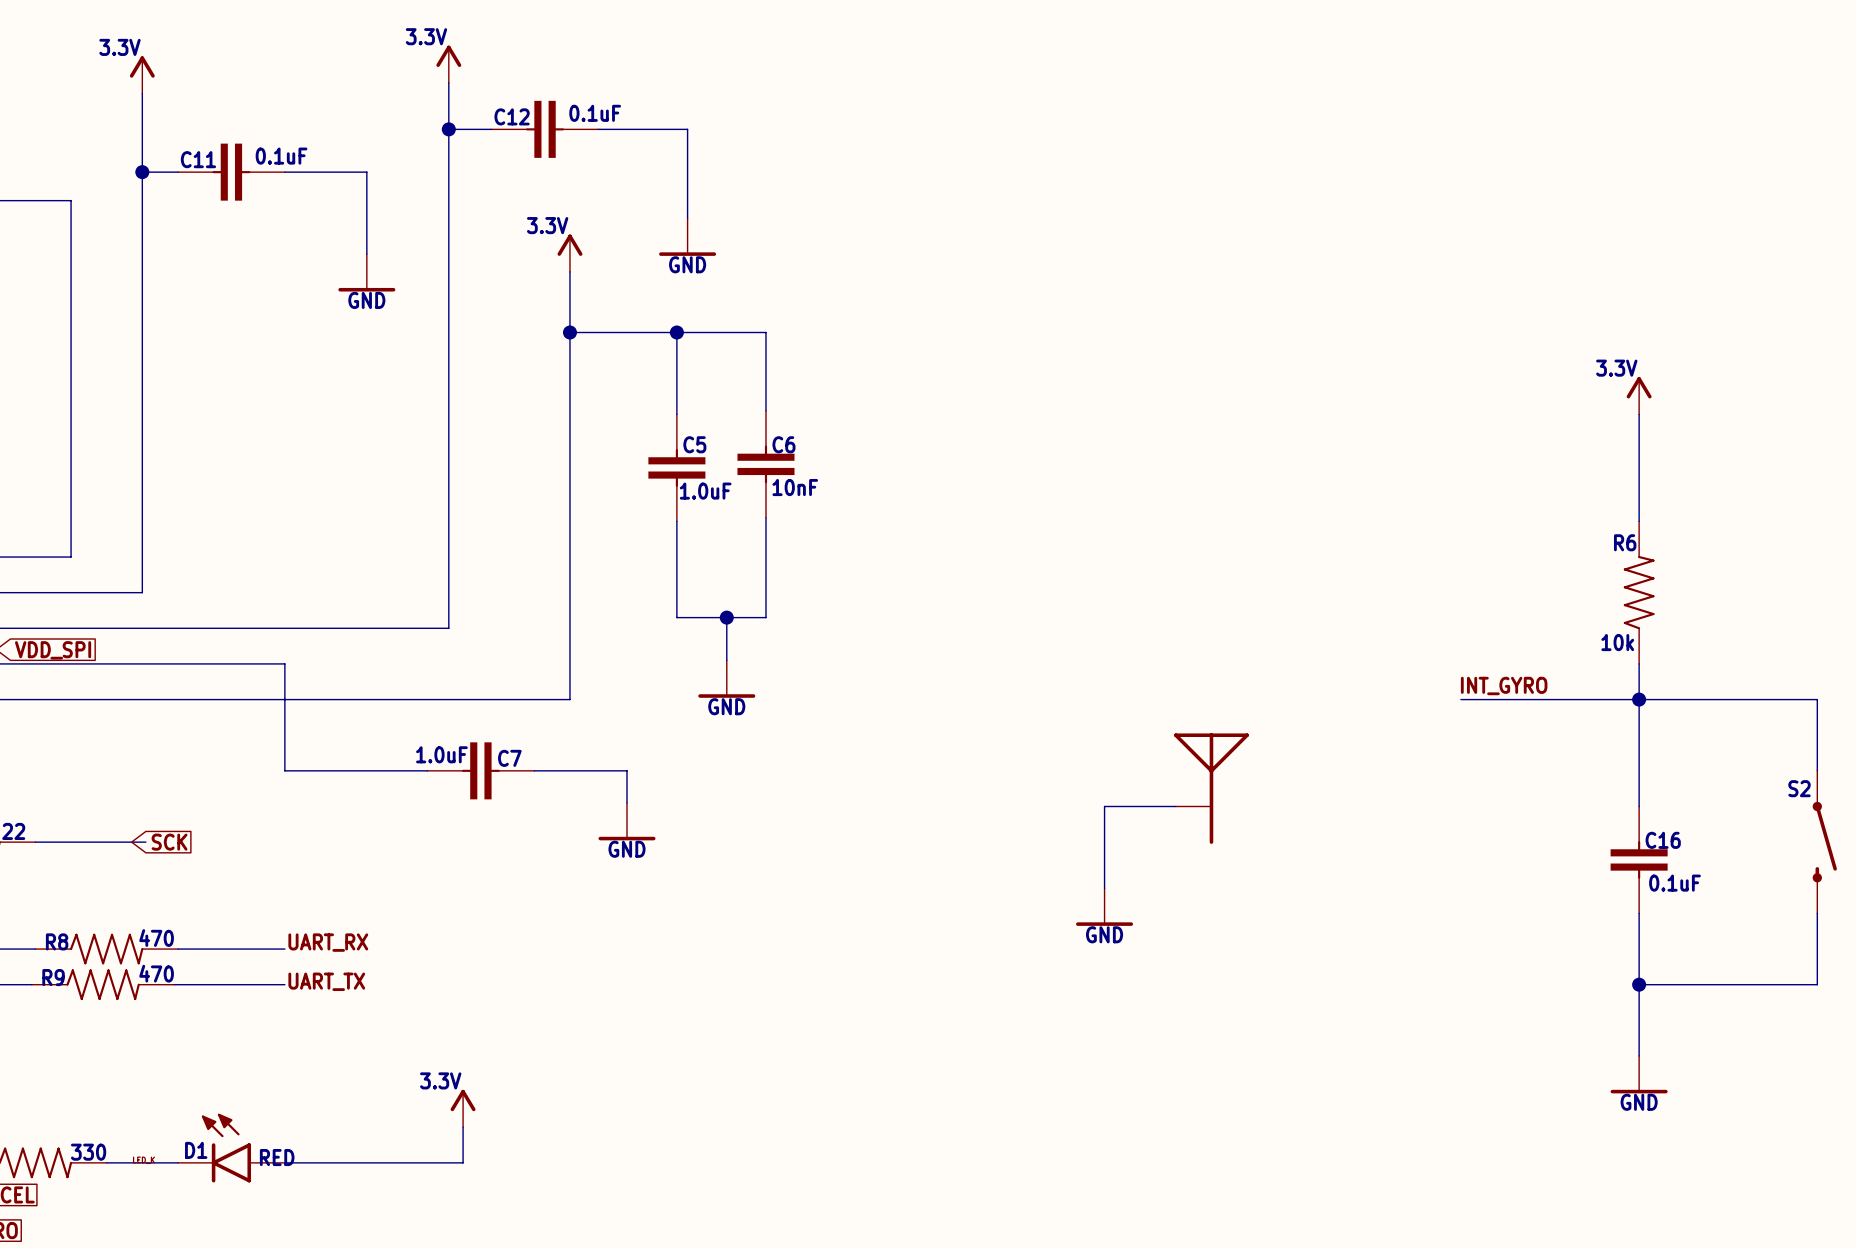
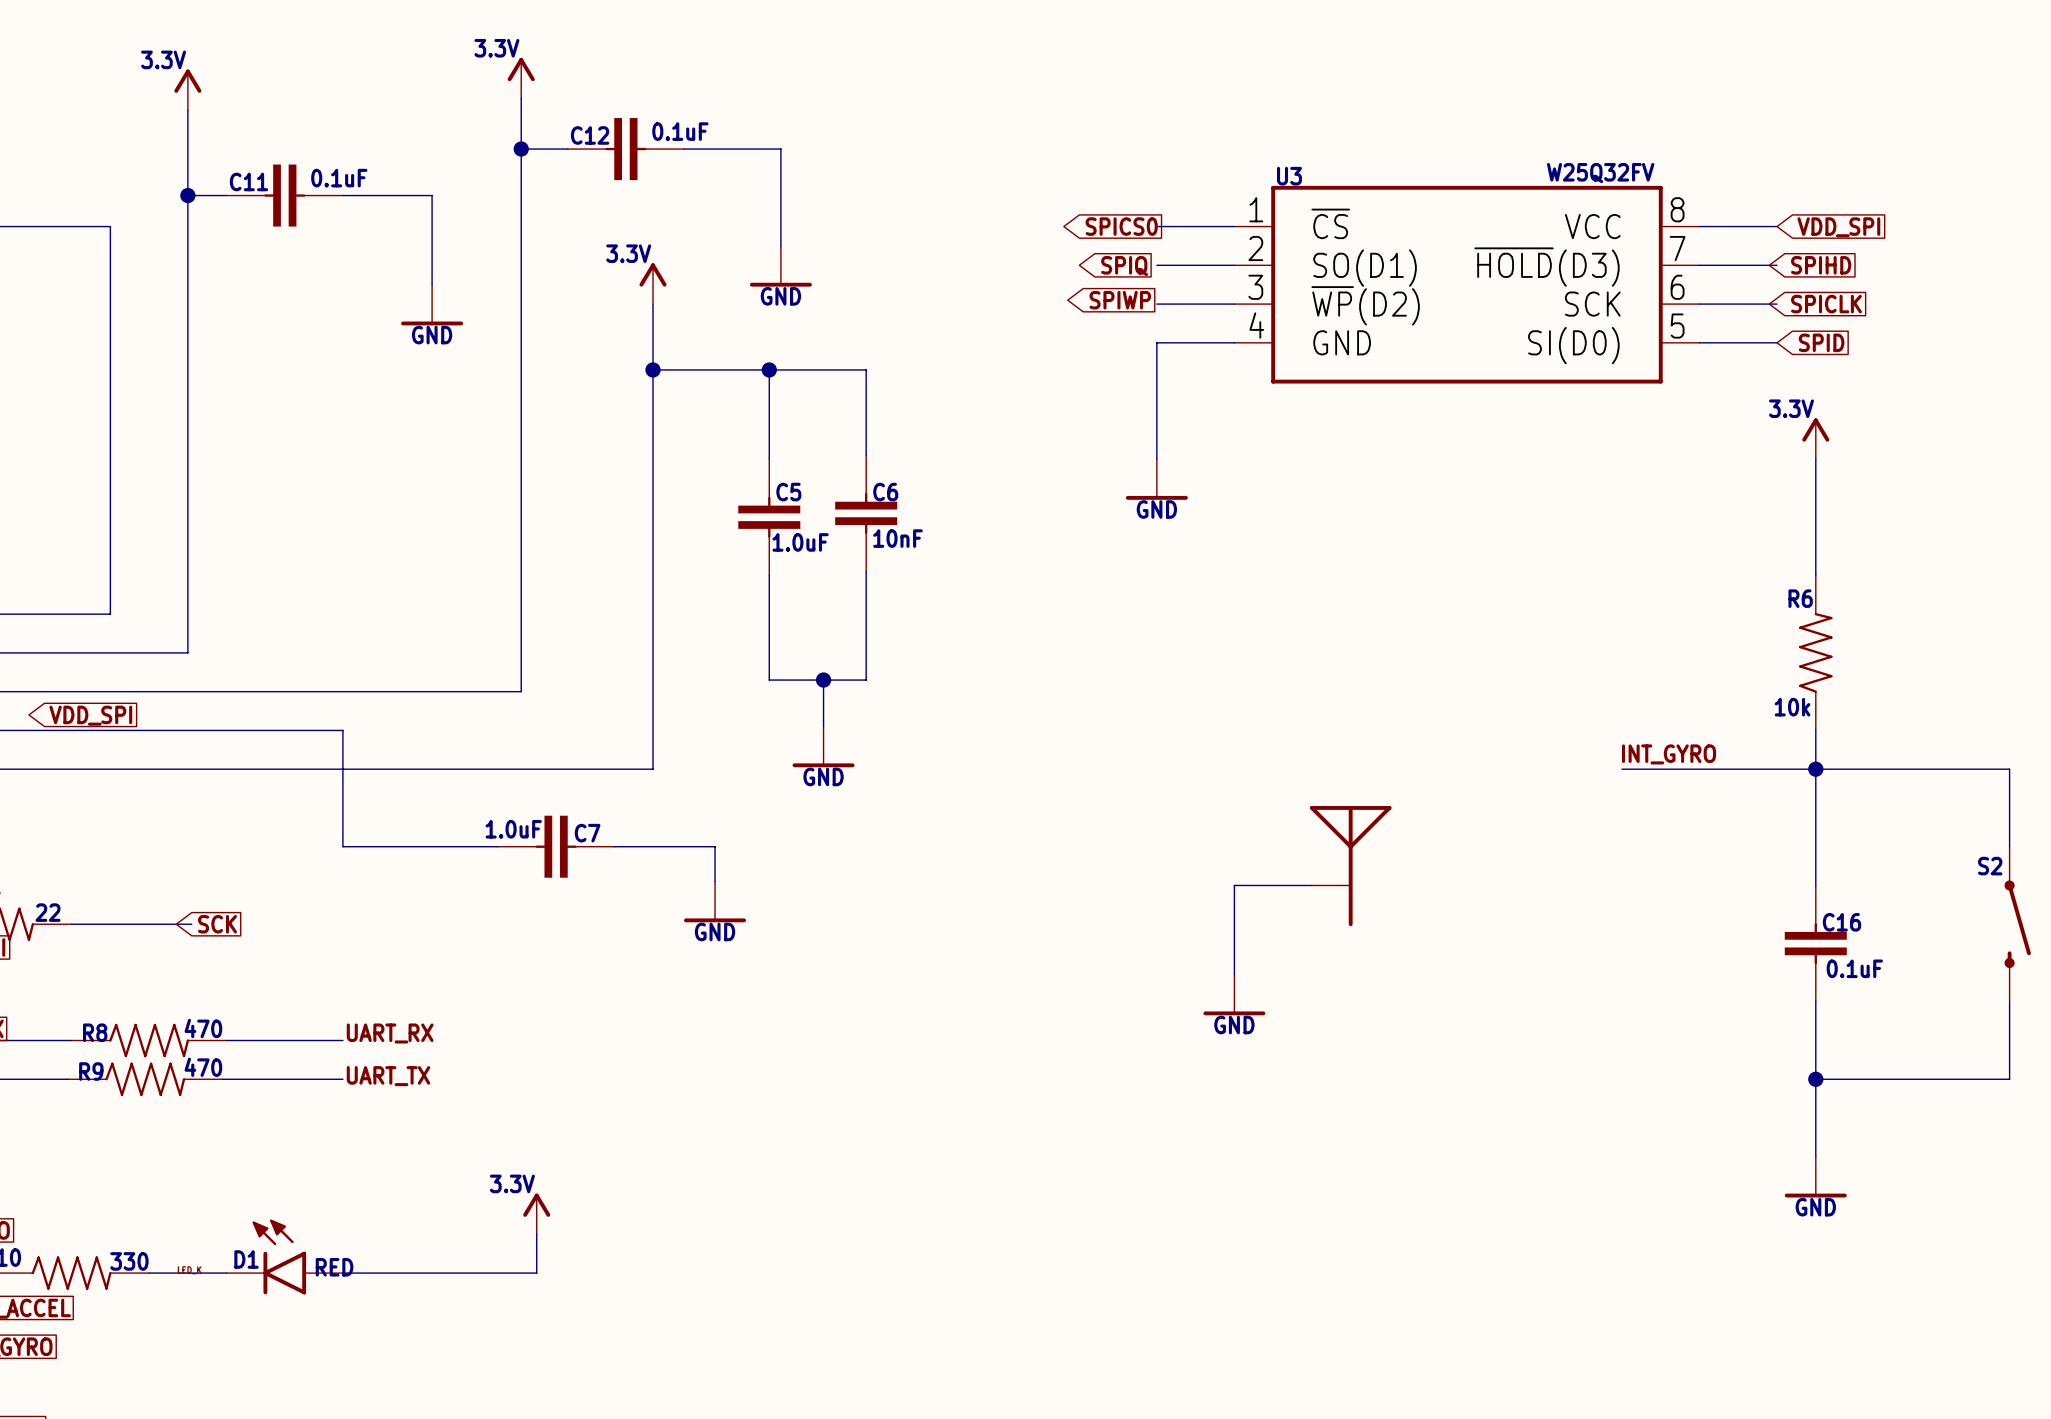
global label: none -> SPICS0 (1121, 226)
wire: none -> (1156, 226) (1234, 226)
wire: none -> (1699, 226) (1777, 226)
global label: none -> VDD_SPI (1838, 227)
global label: none -> SPIQ (1124, 266)
wire: none -> (1156, 265) (1234, 265)
wire: none -> (1699, 265) (1777, 265)
global label: none -> SPIHD (1821, 265)
U3: none -> W25Q32FV (1466, 284)
global label: none -> SPIWP (1120, 300)
wire: none -> (1156, 304) (1234, 304)
wire: none -> (1699, 304) (1777, 304)
global label: none -> SPICLK (1826, 304)
wire: none -> (1234, 342) (1156, 342) (1156, 459)
wire: none -> (1699, 342) (1777, 342)
global label: none -> SPID (1821, 342)
power symbol: none -> GND (1156, 479)

